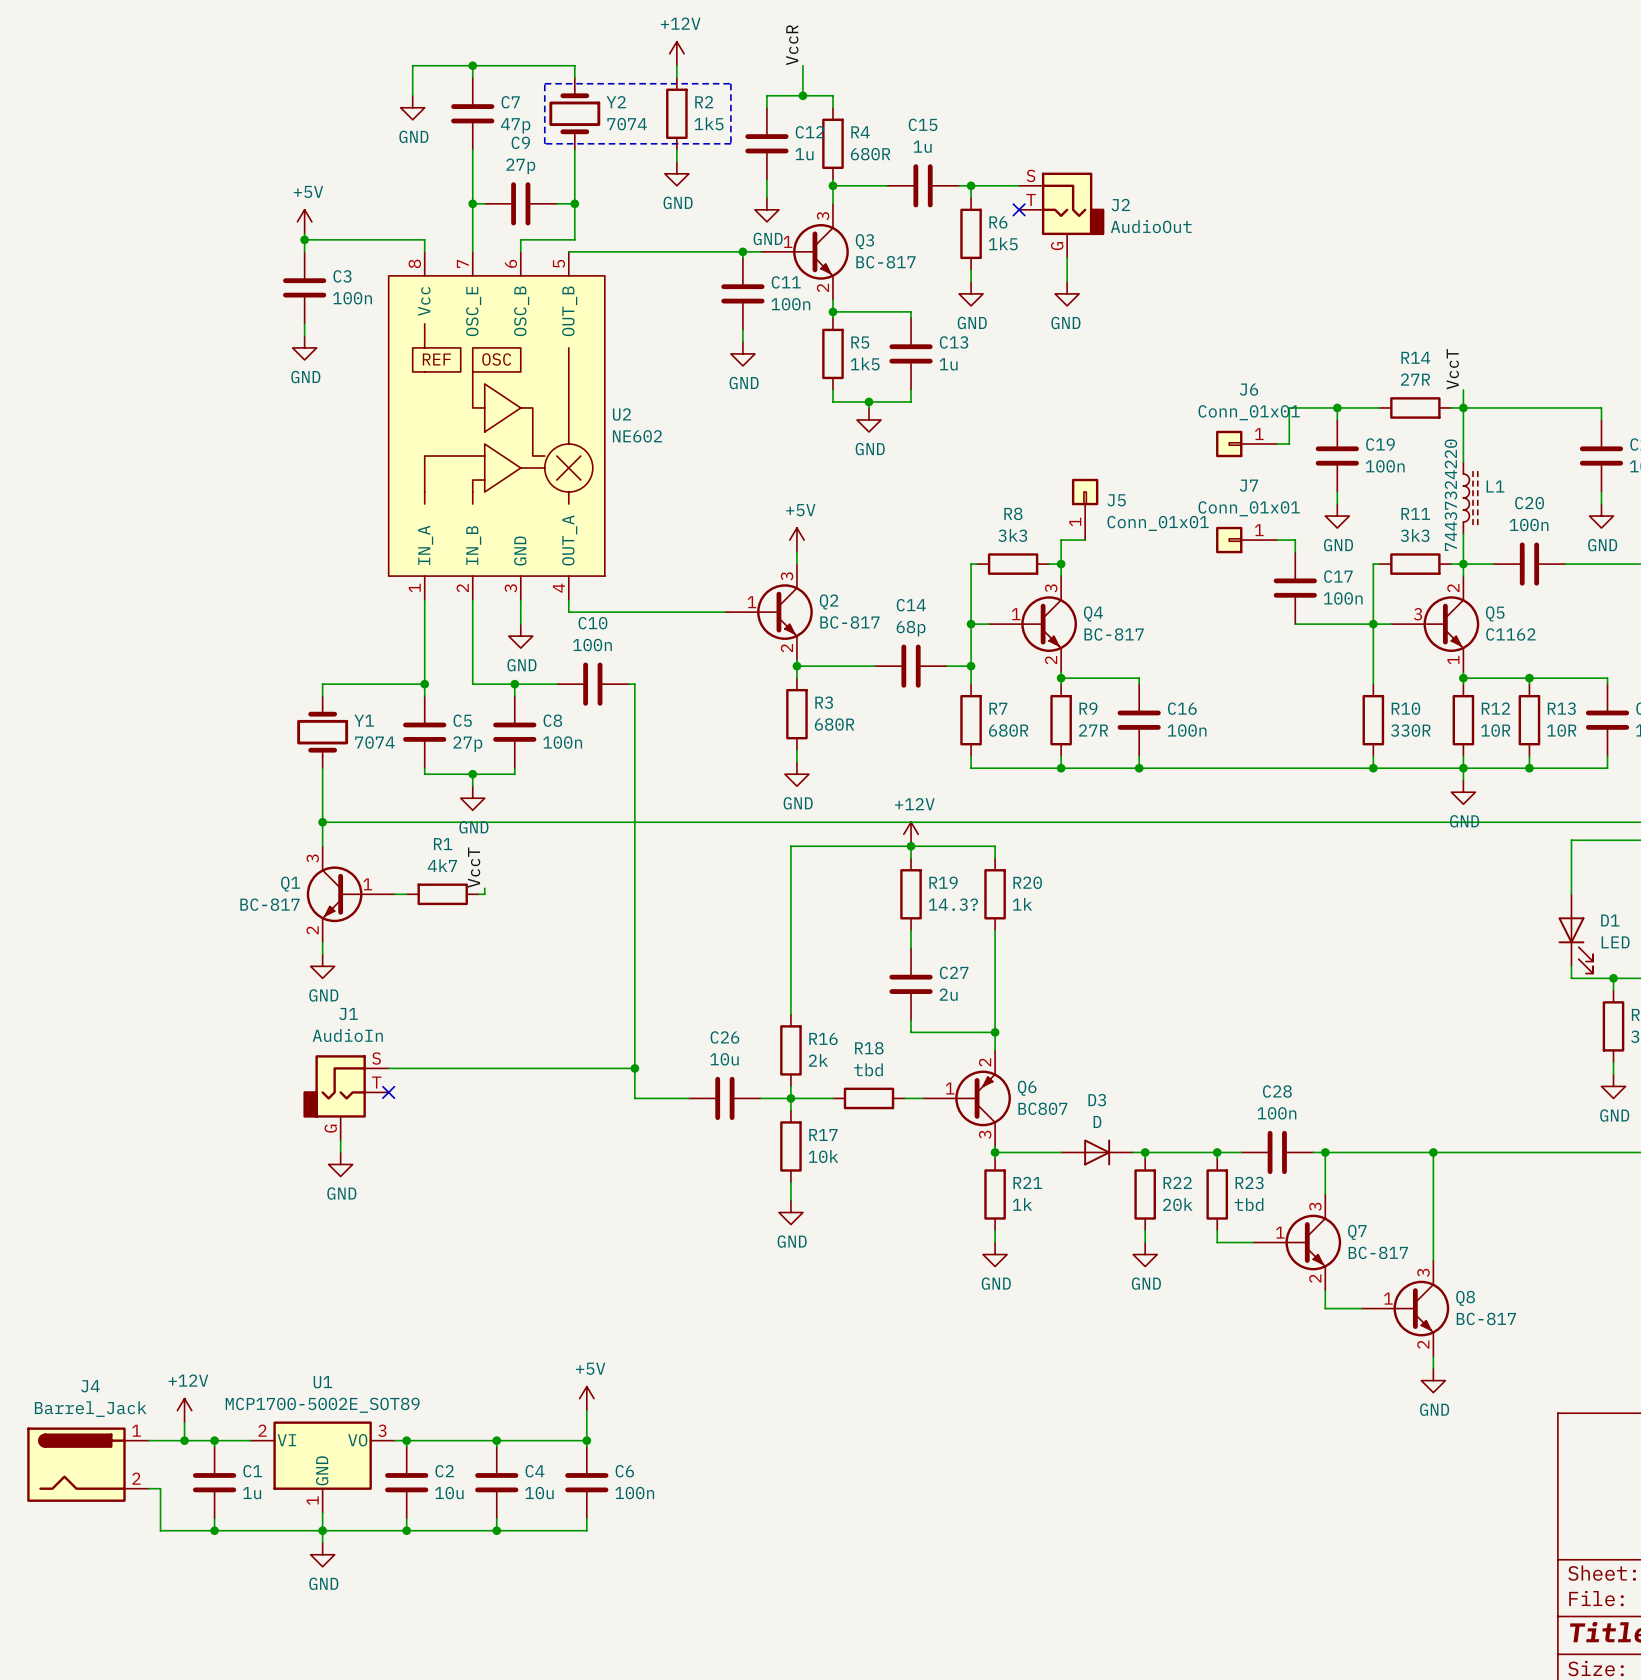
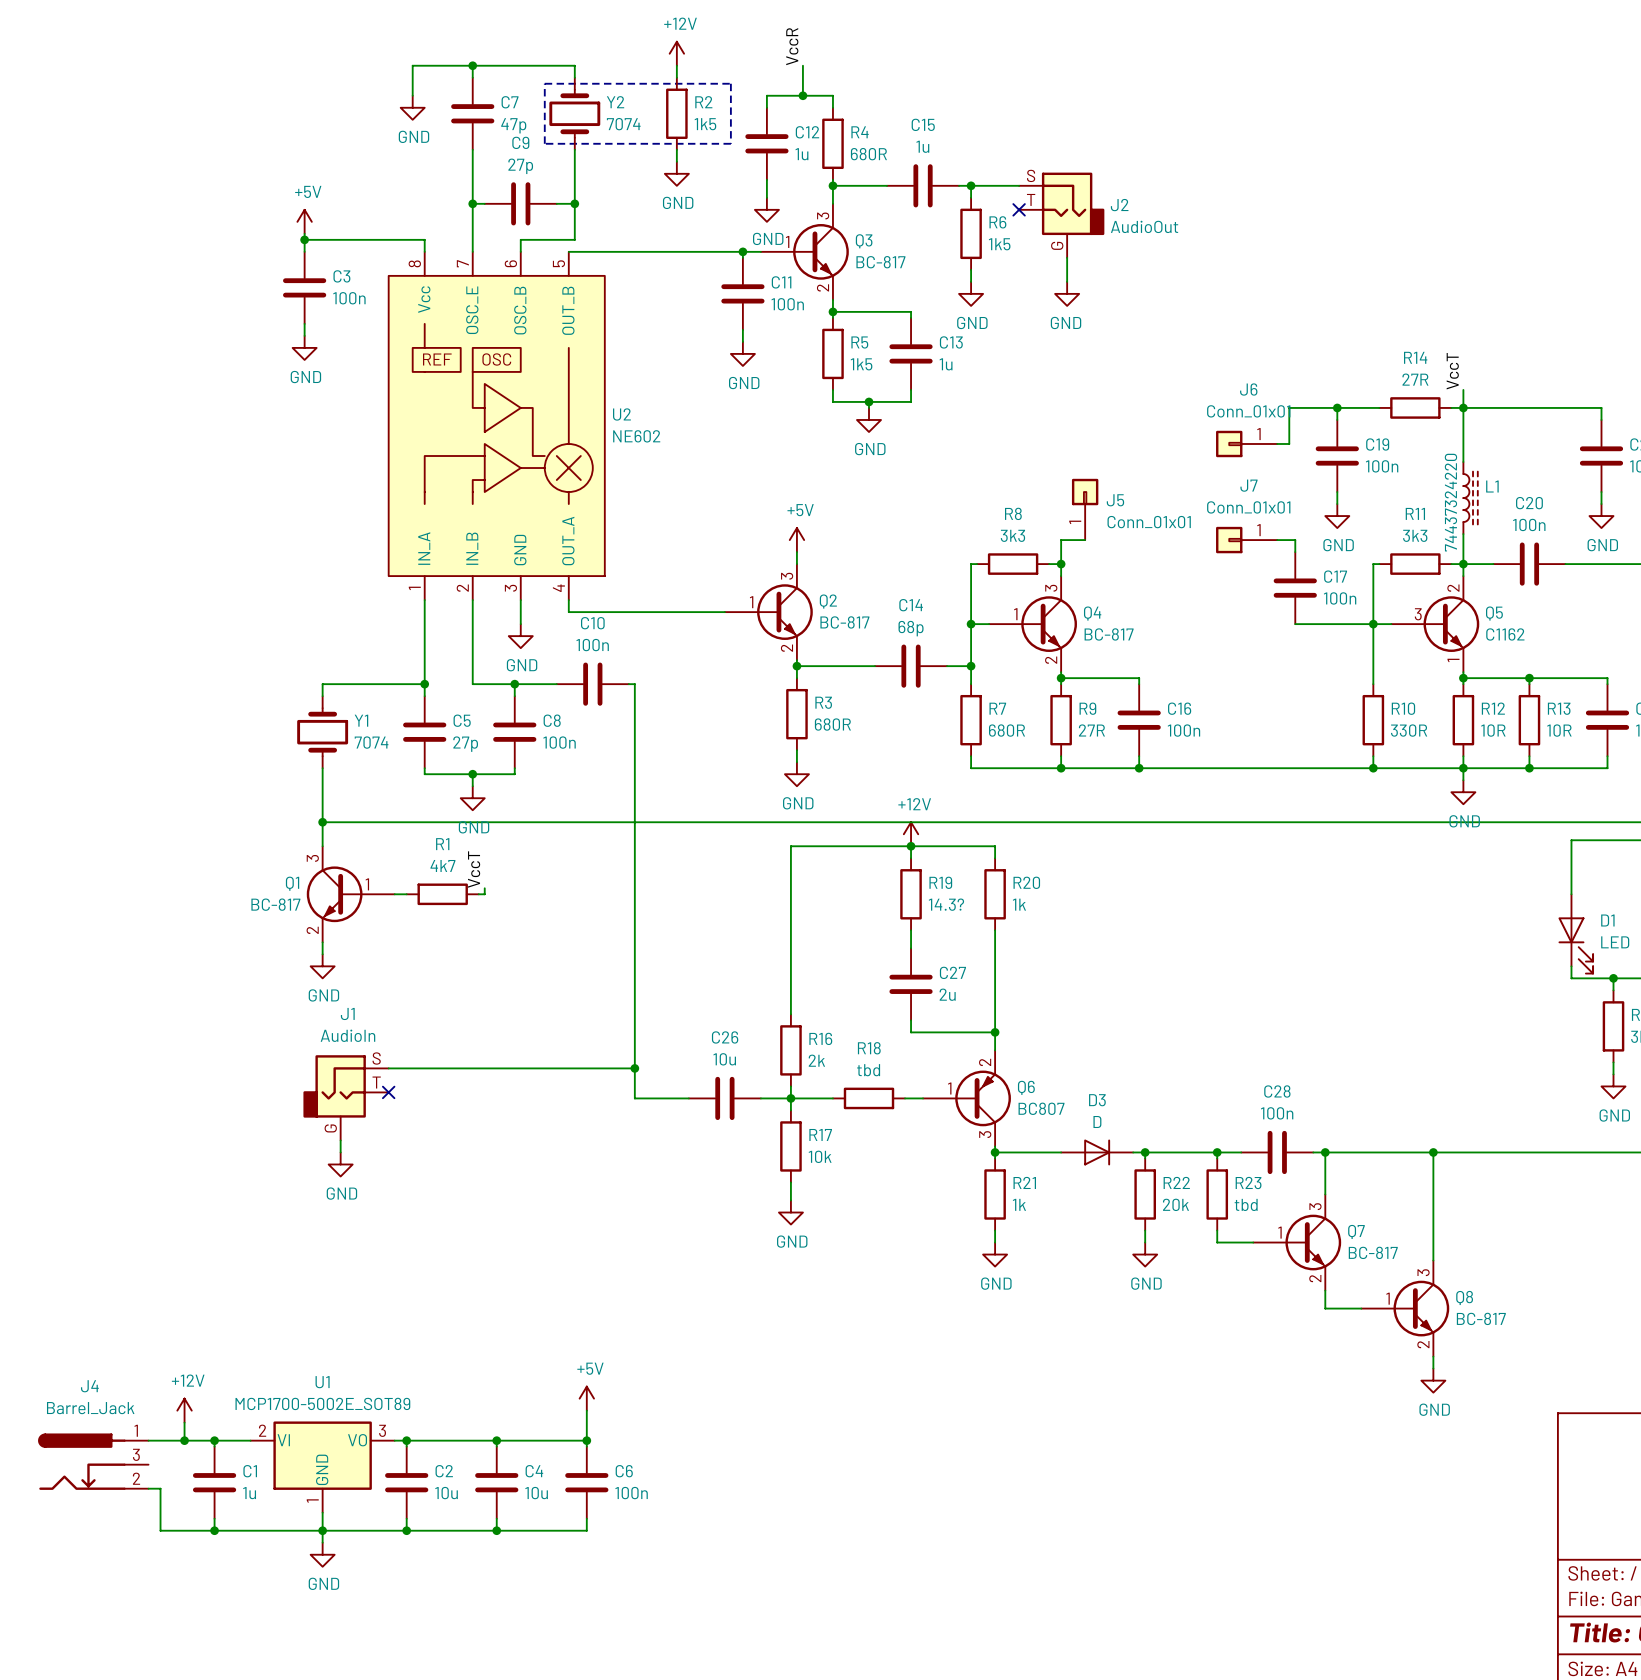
J4 symbol: [27, 1427, 149, 1502] -> [38, 1433, 149, 1490]

